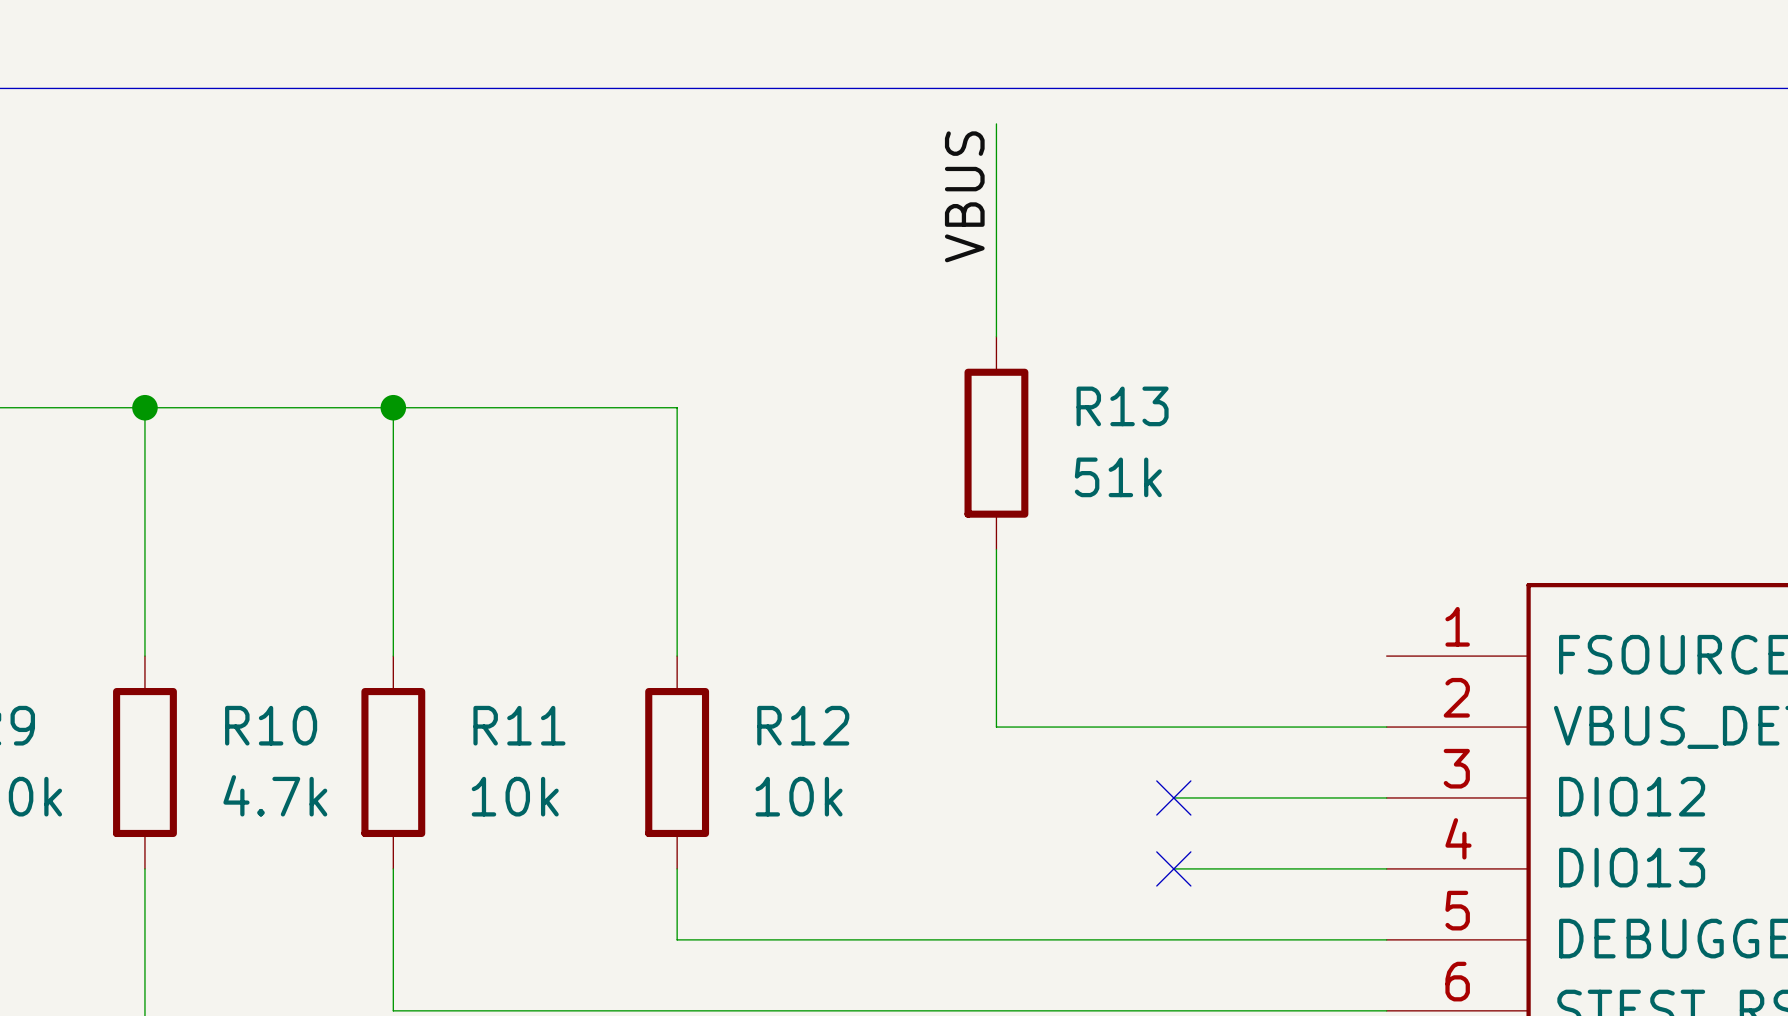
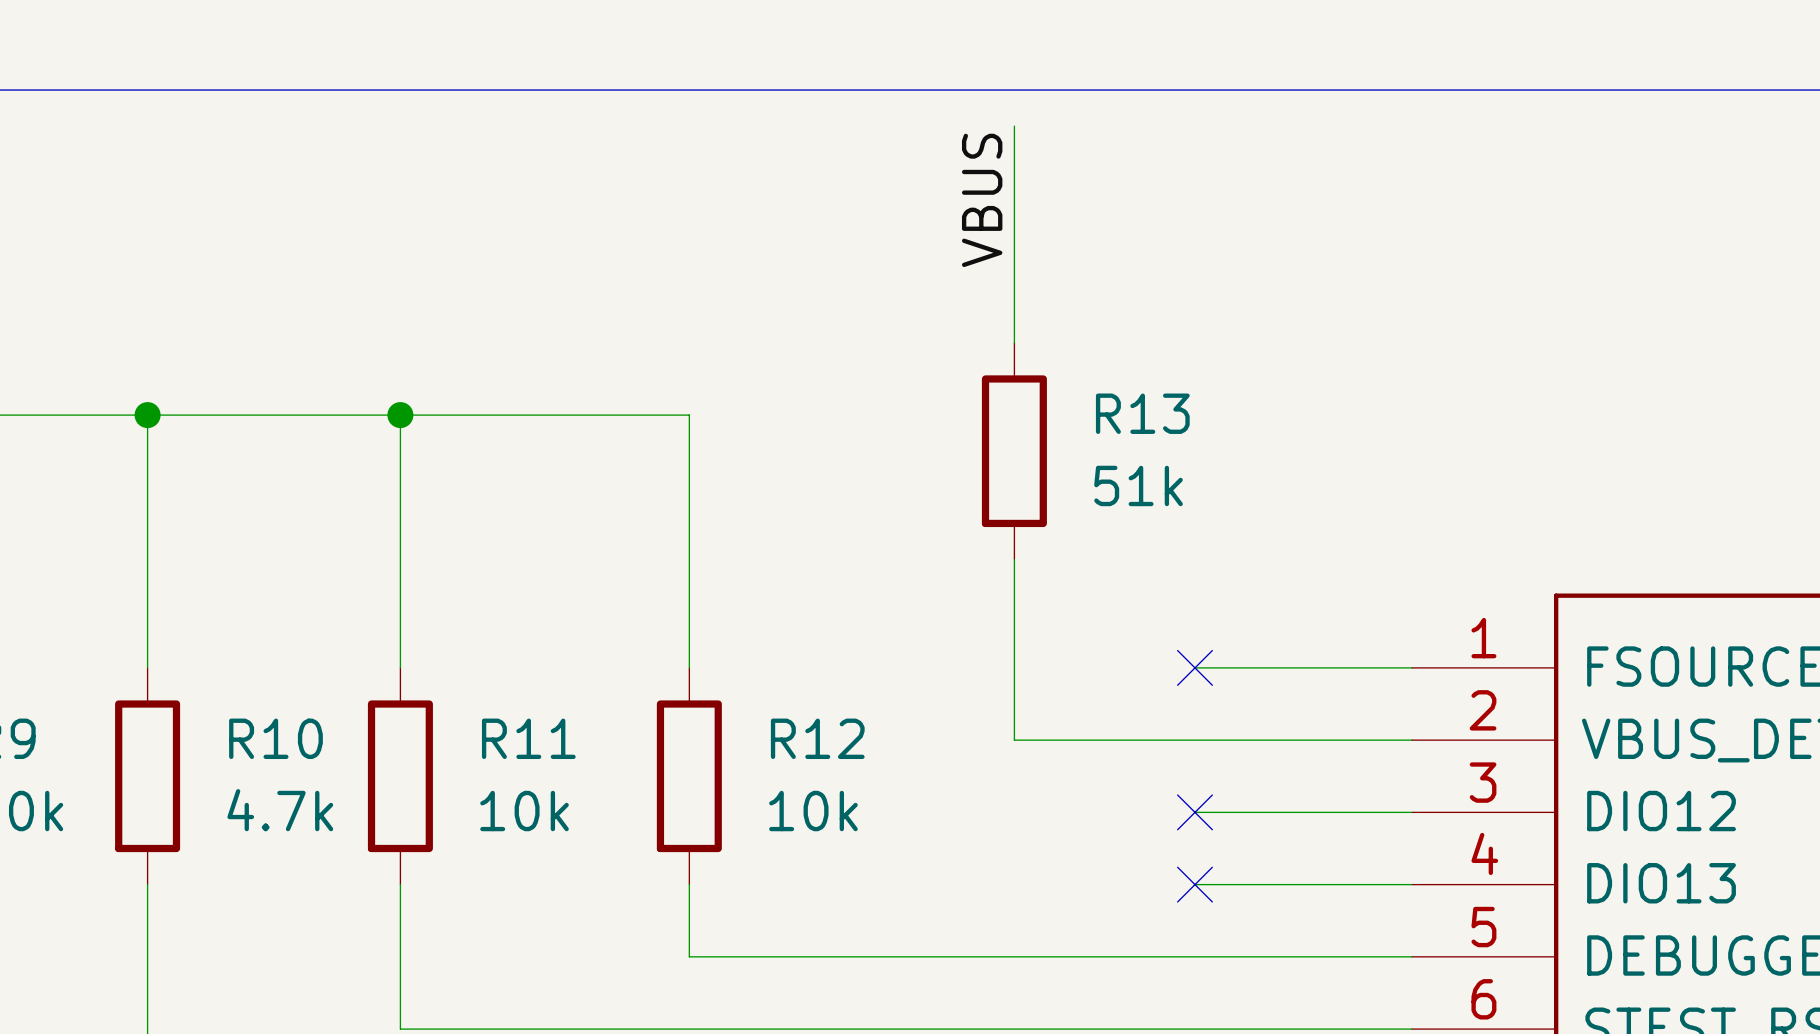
wire: none -> (1194, 667) (1411, 667)
no-connect mark: none -> (1194, 667)

